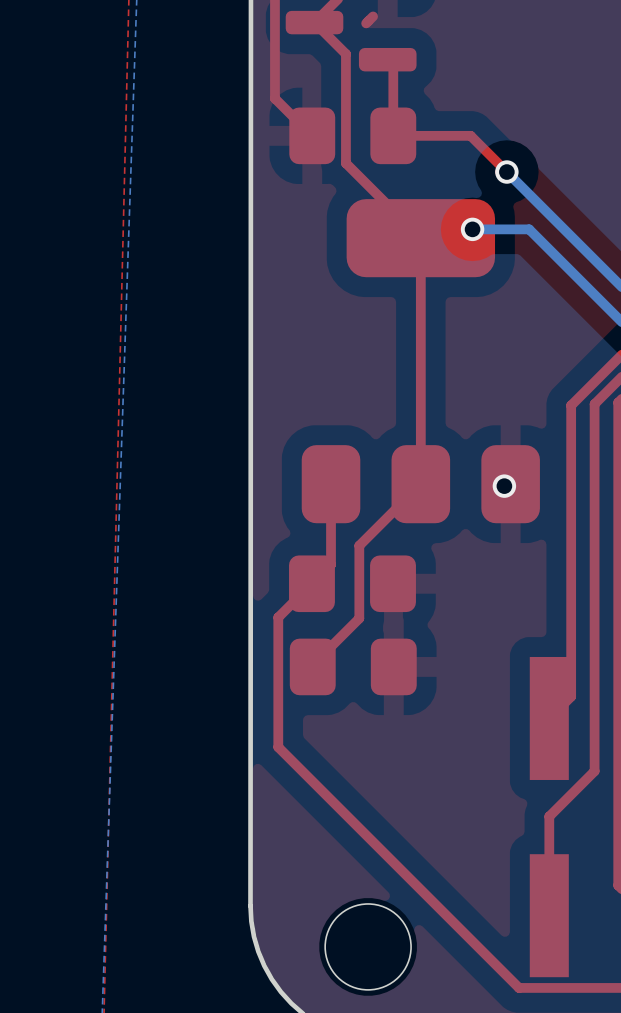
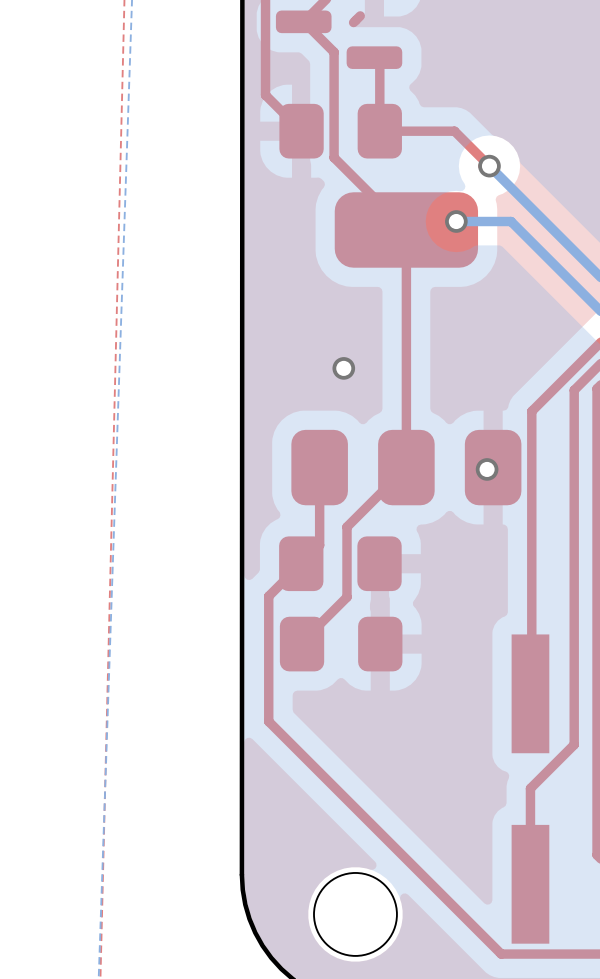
via: none -> (343, 368)
top track: (571, 405) (571, 696) (550, 717) -> (551, 391) (531, 411) (531, 692)

